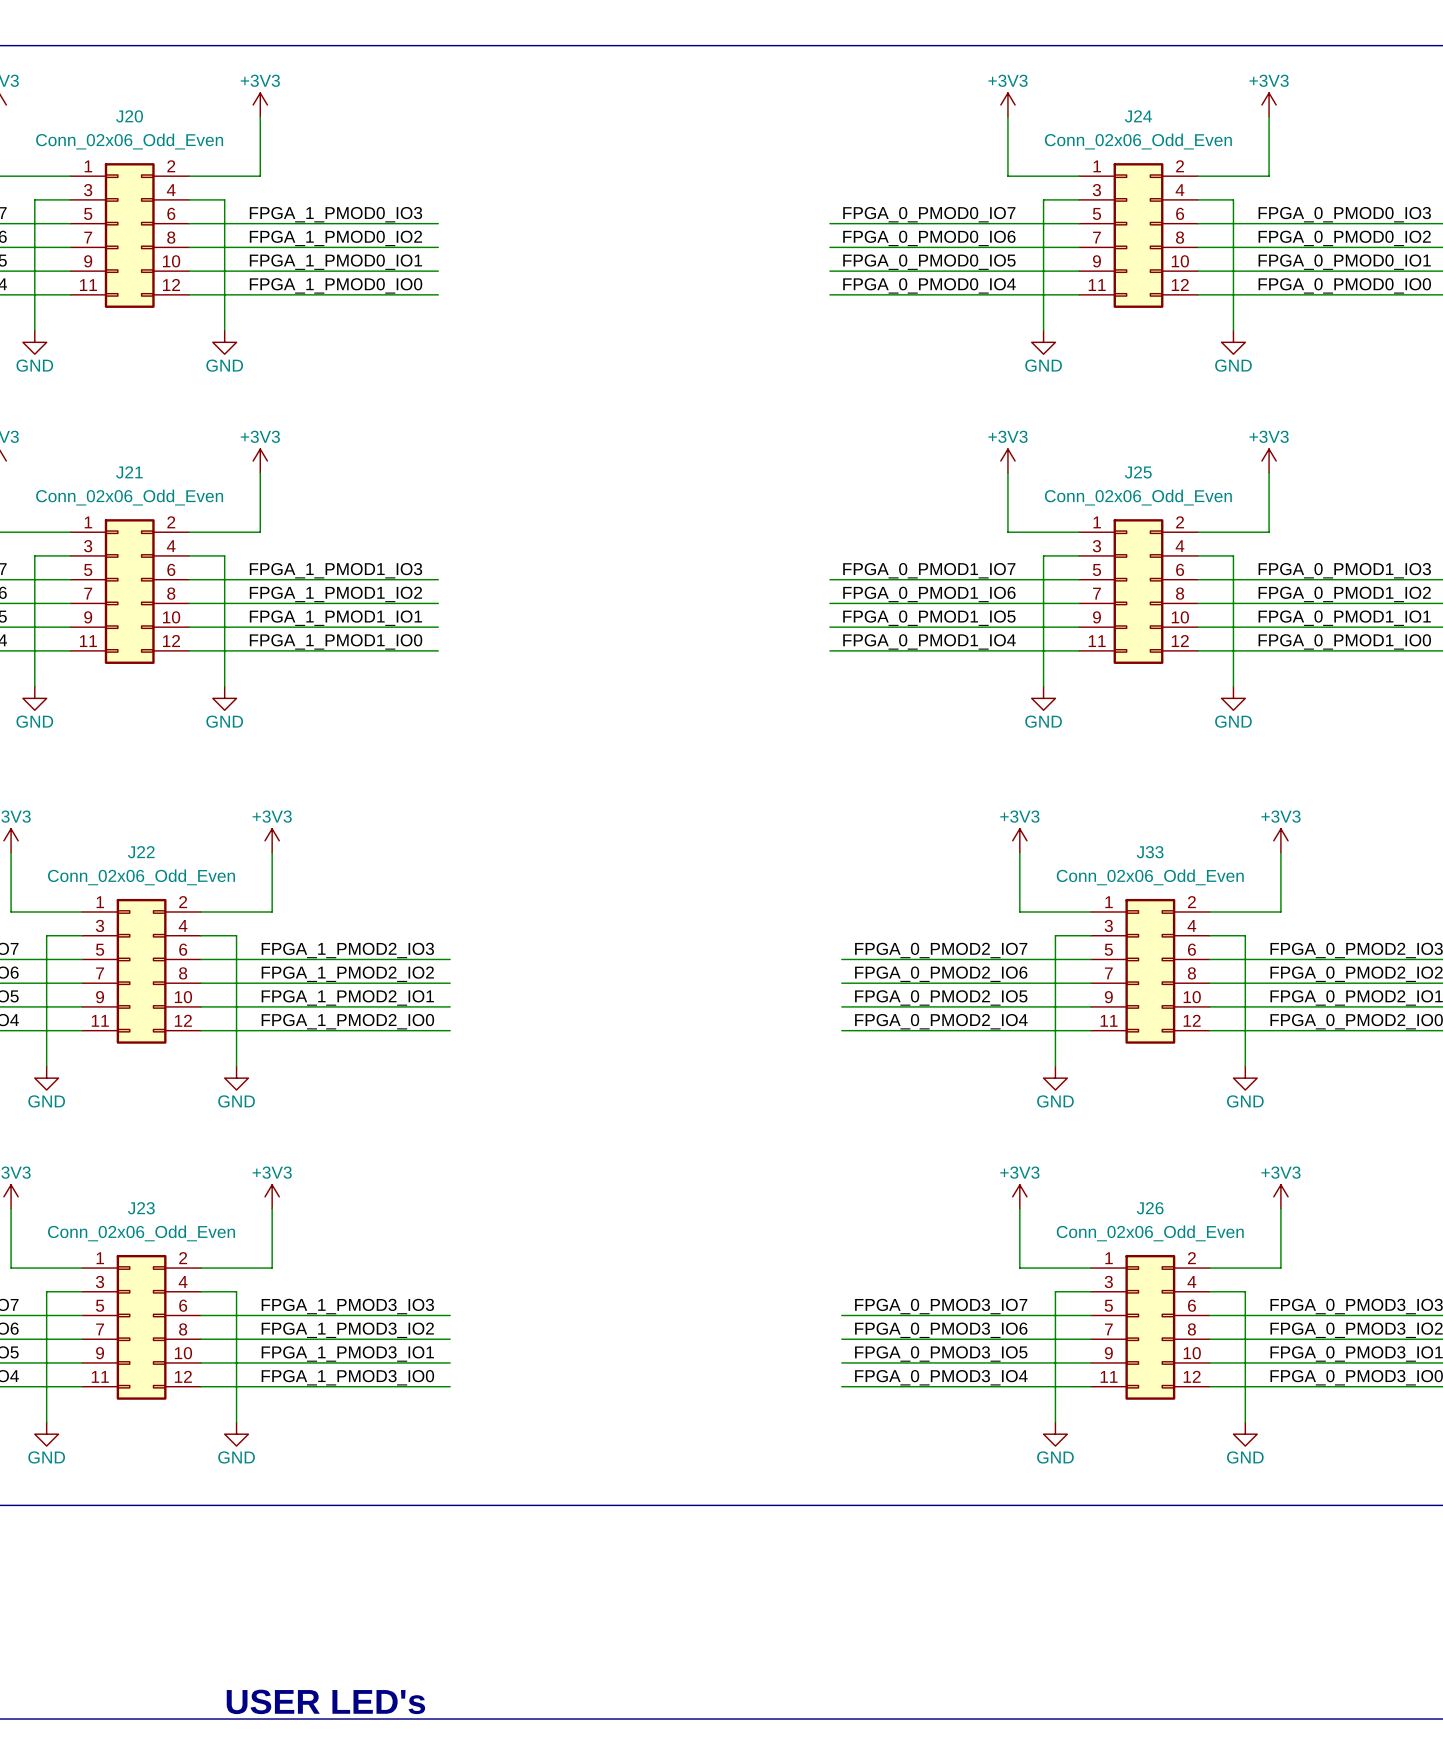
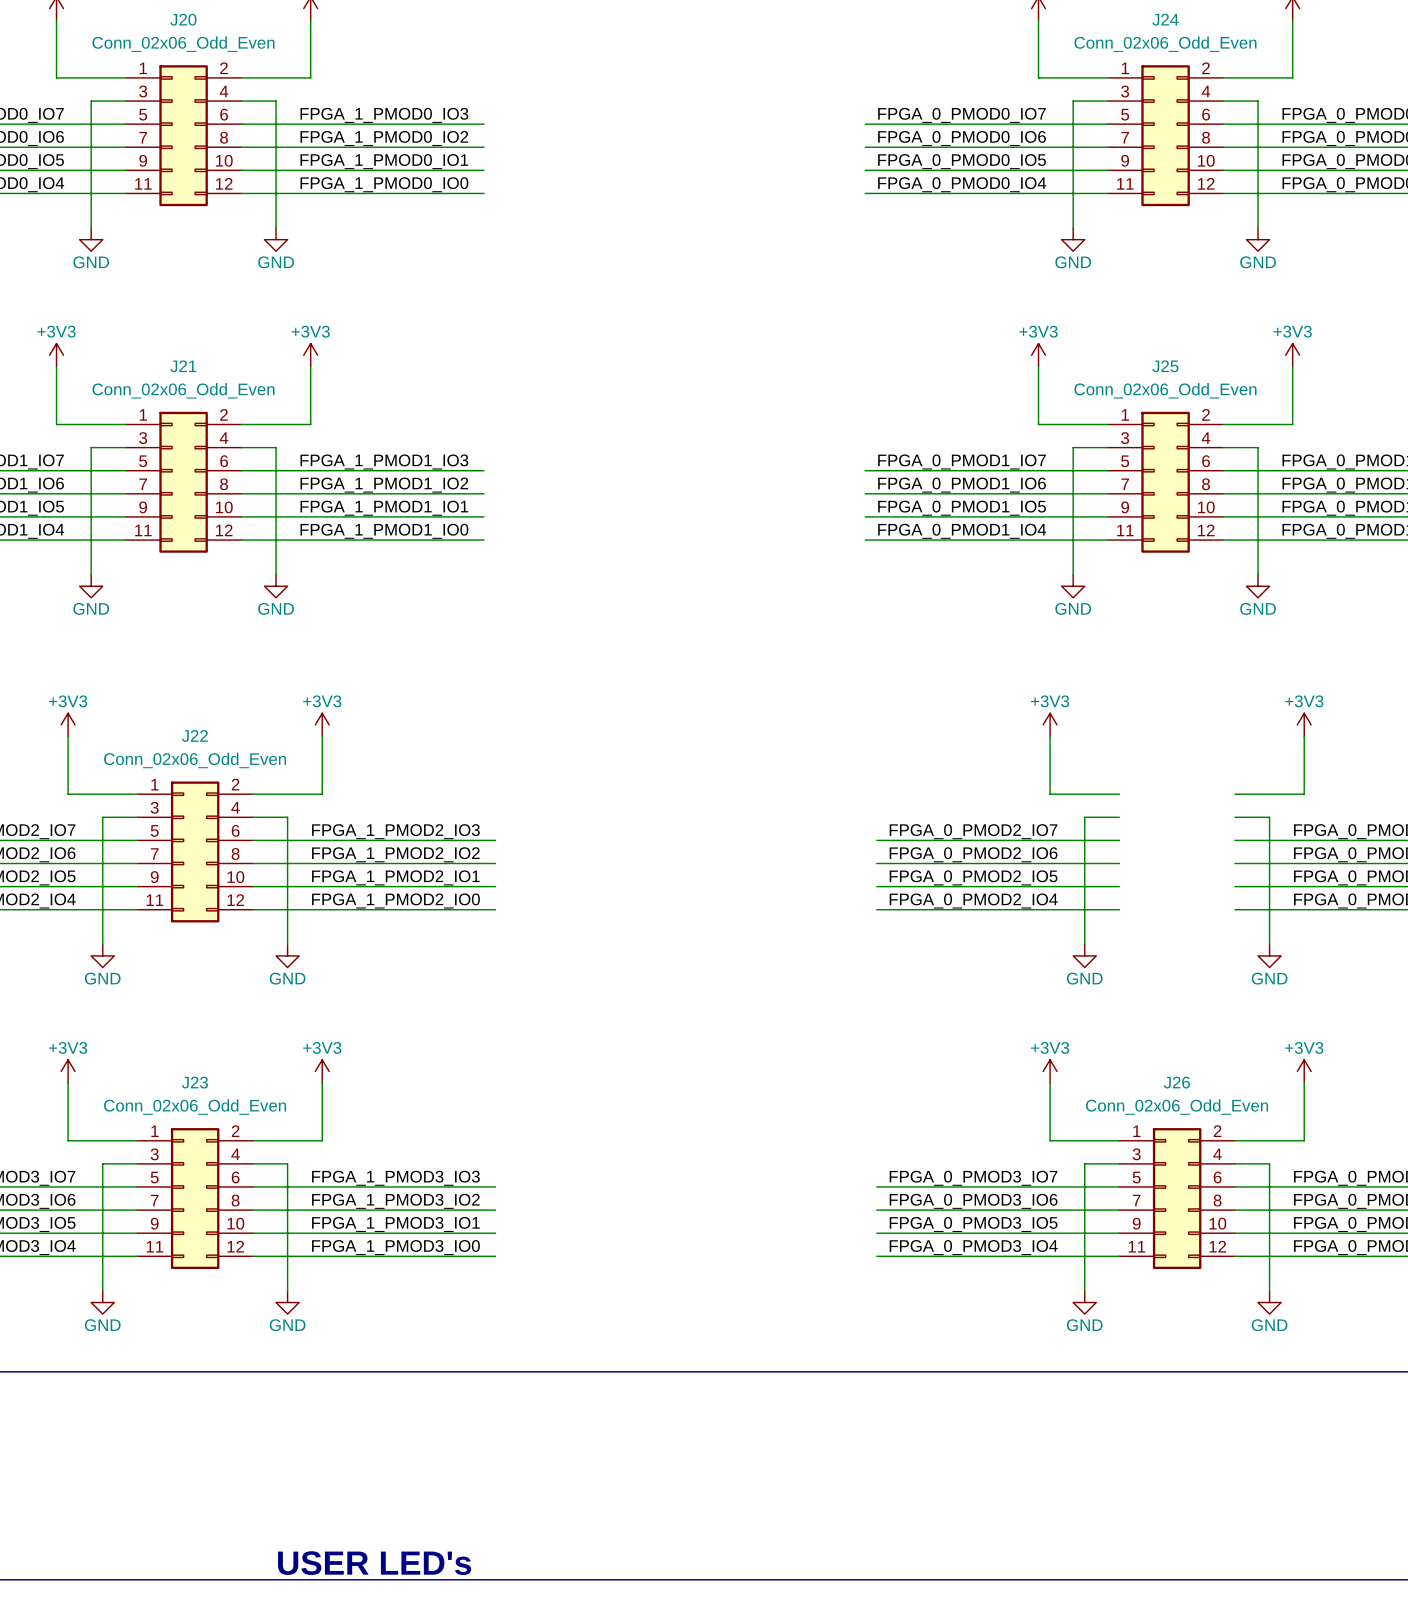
J33: Conn_02x06_Odd_Even (1150, 971) -> none

